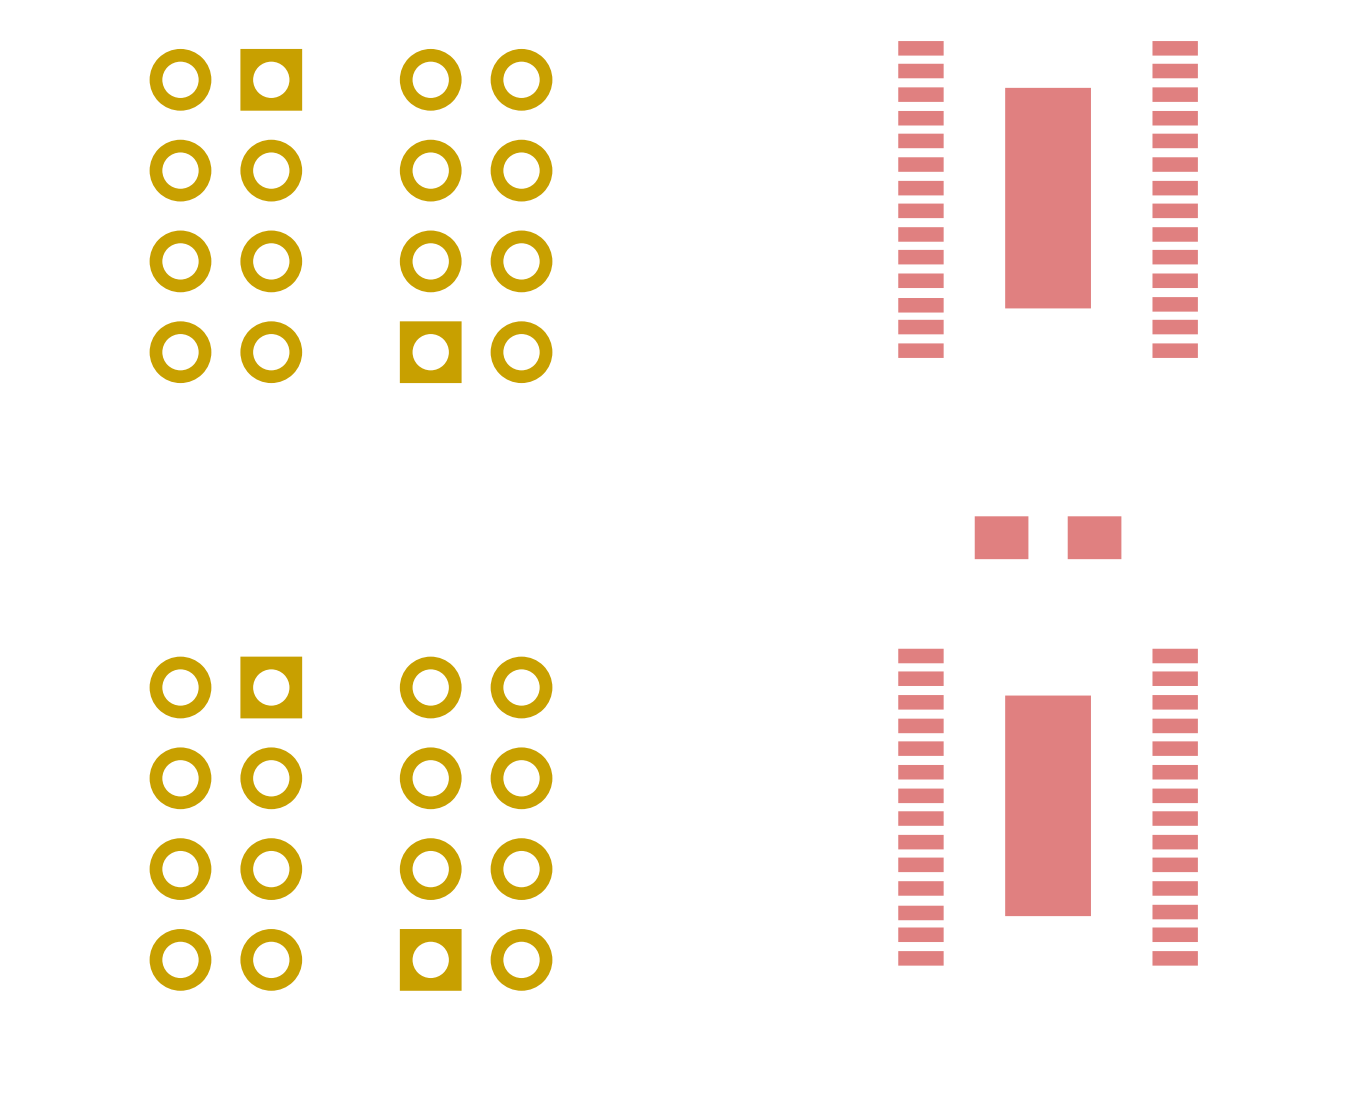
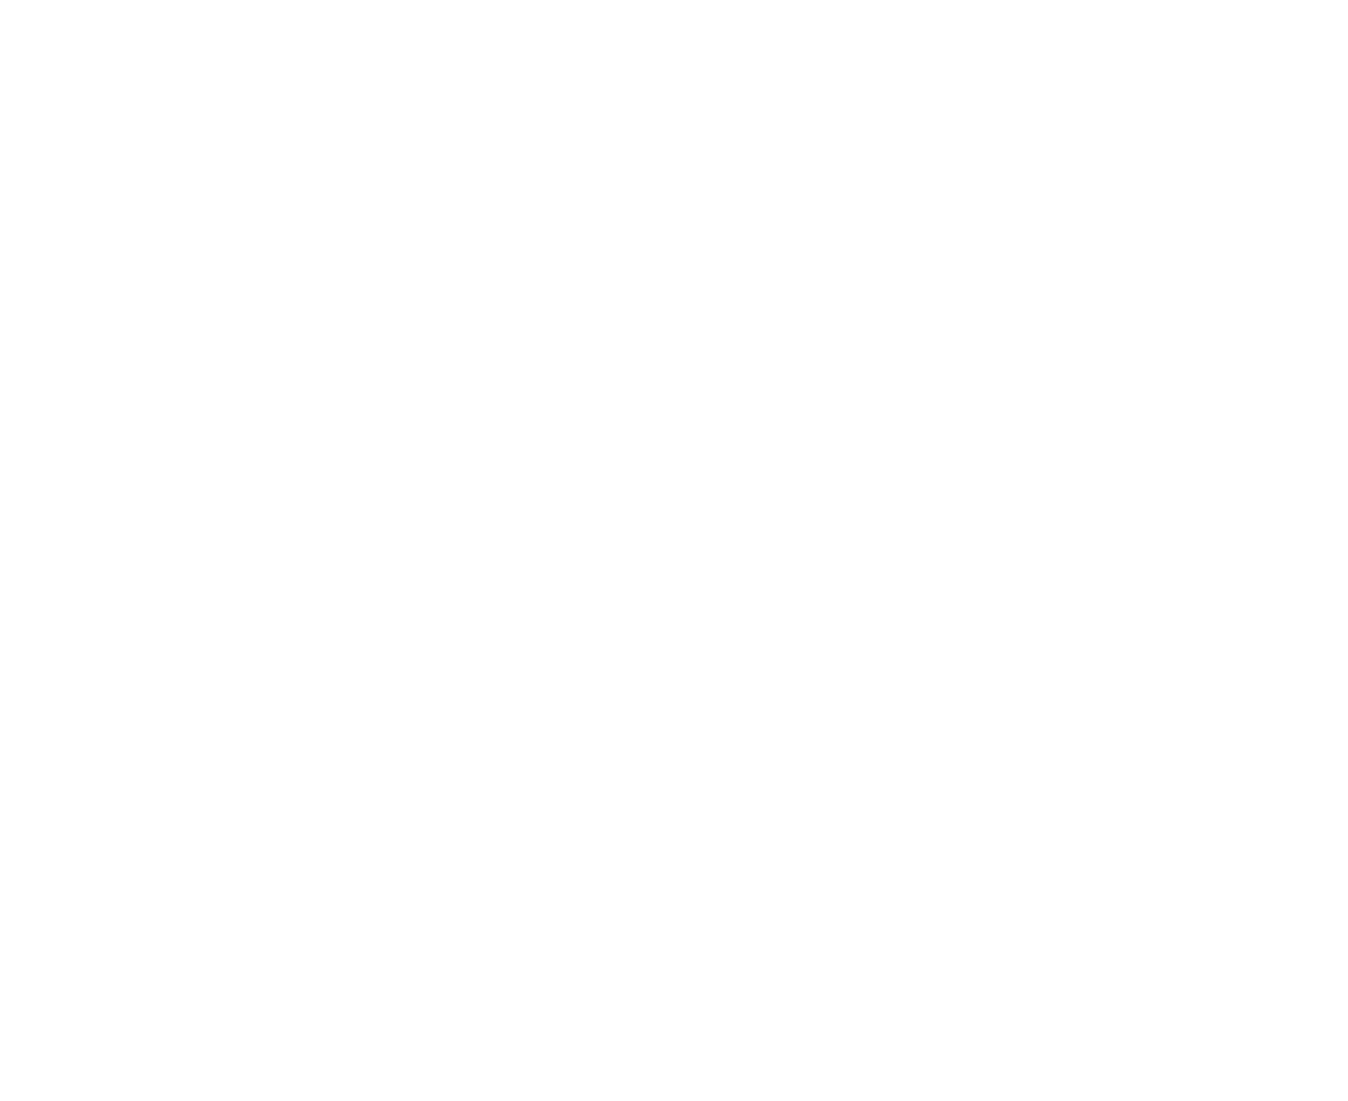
part: (1048, 199) -> none
part: (225, 216) -> none
part: (476, 216) -> none
part: (1048, 537) -> none
part: (1048, 807) -> none
part: (225, 823) -> none
part: (476, 823) -> none

